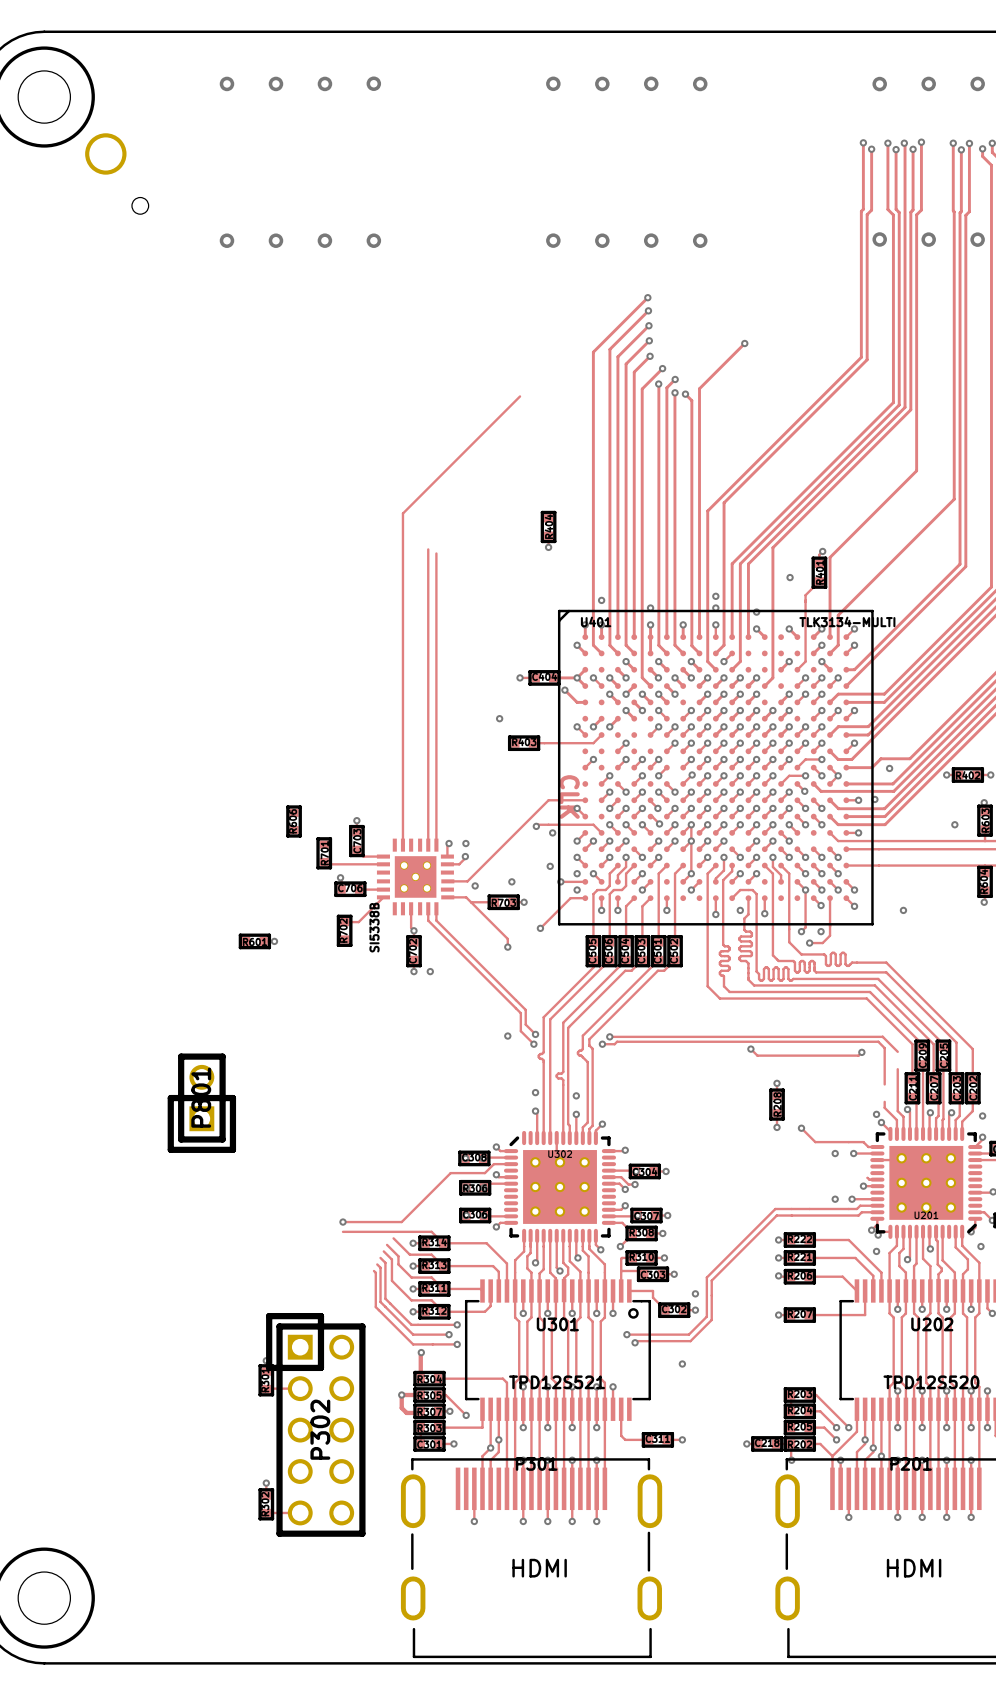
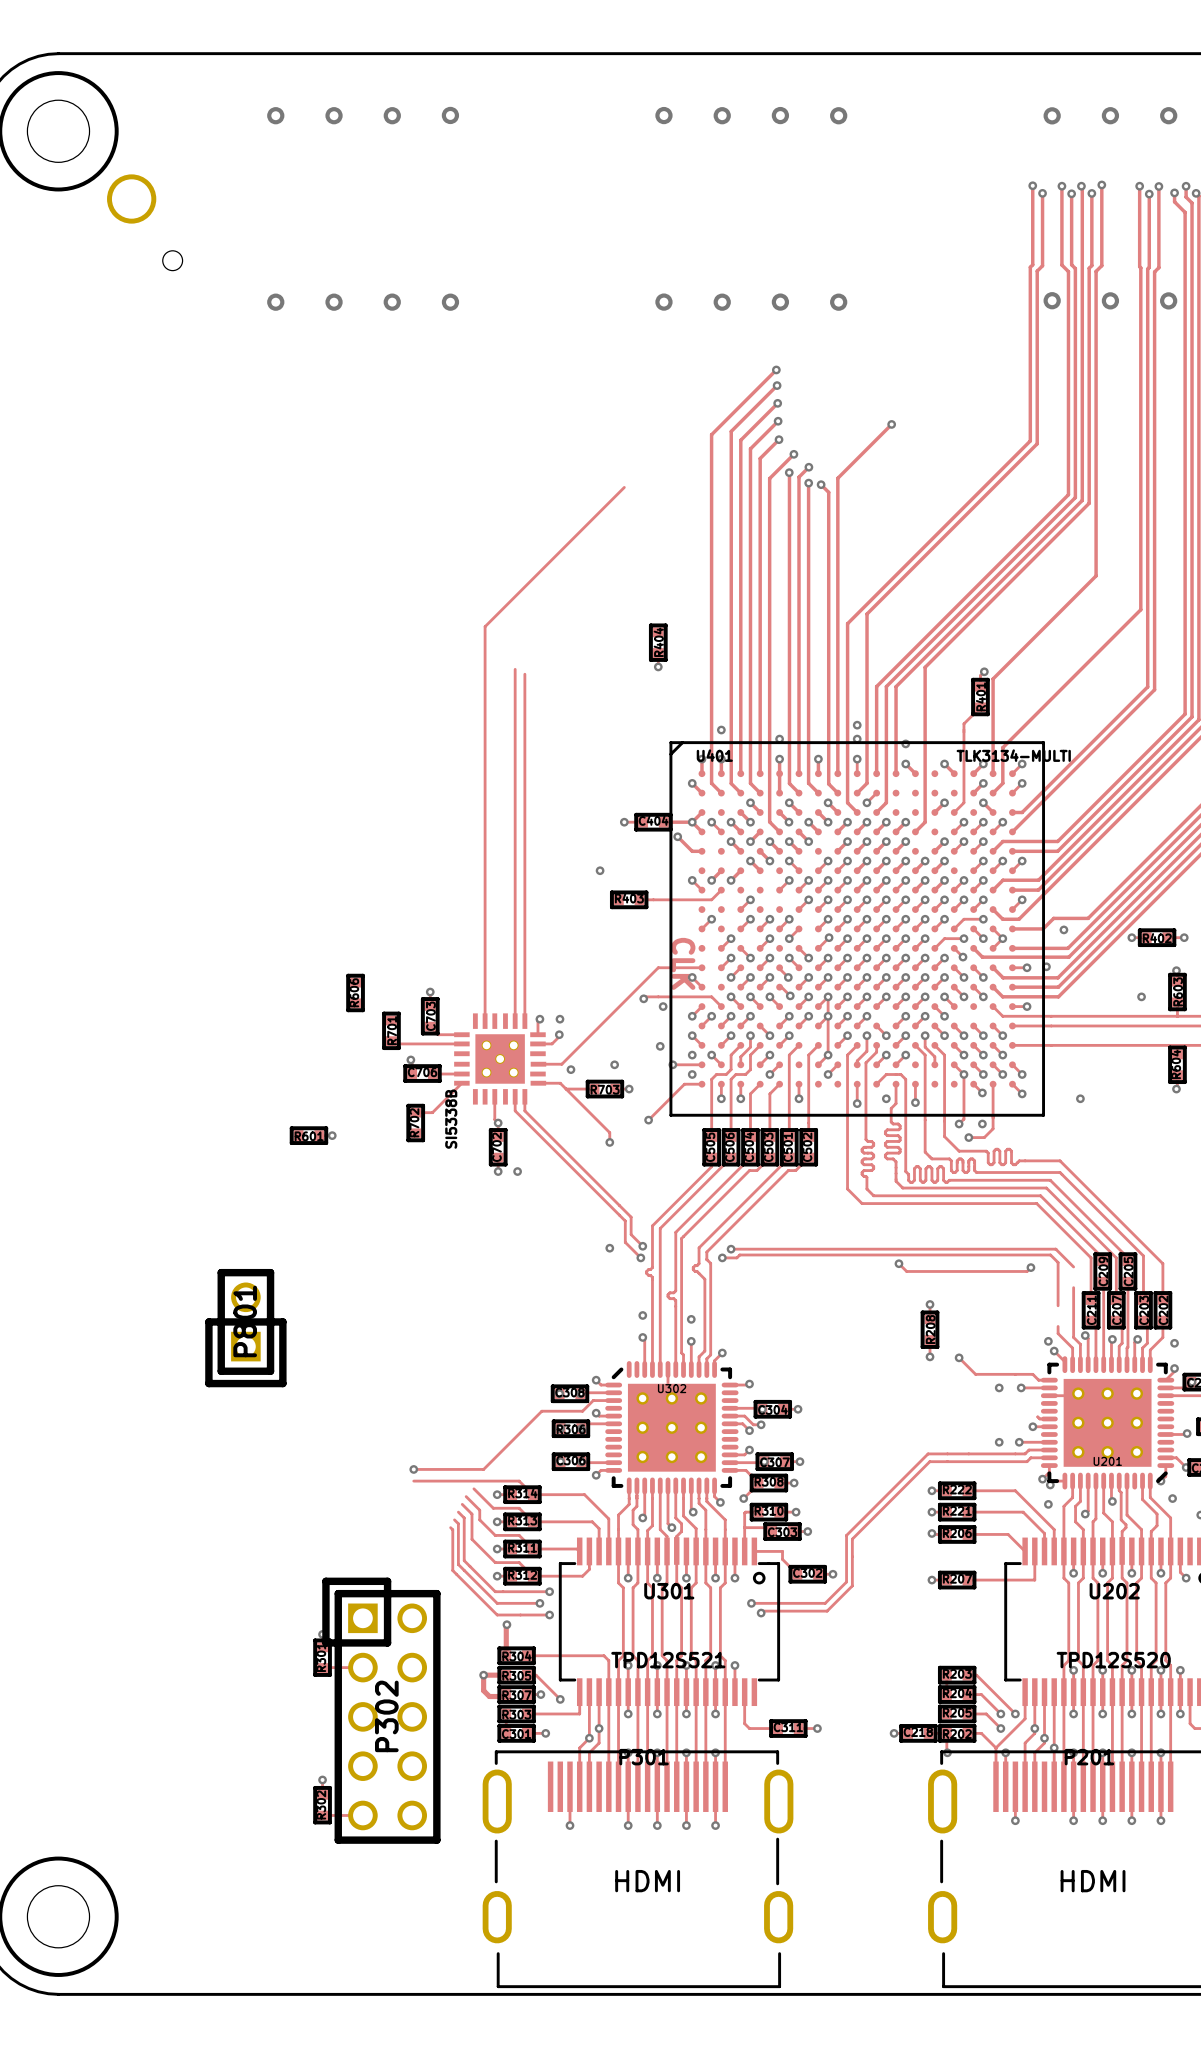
via: (790, 577) -> none
via: (695, 1293) -> none
via: (682, 1364) -> none

